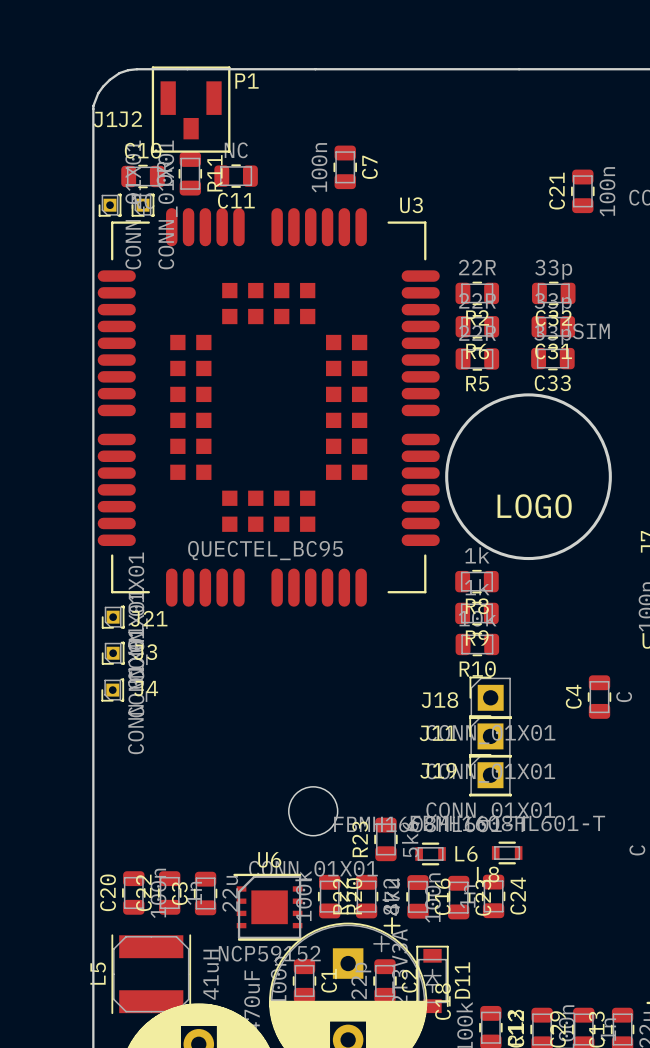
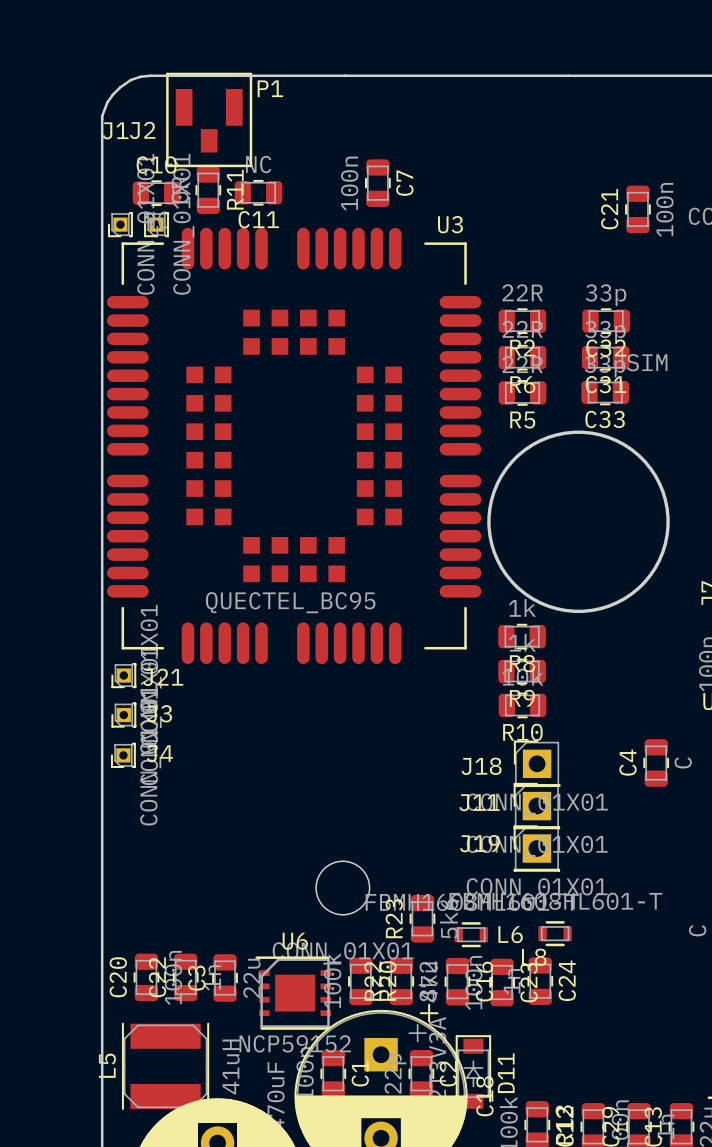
drawing: [497, 494, 572, 519] -> none

